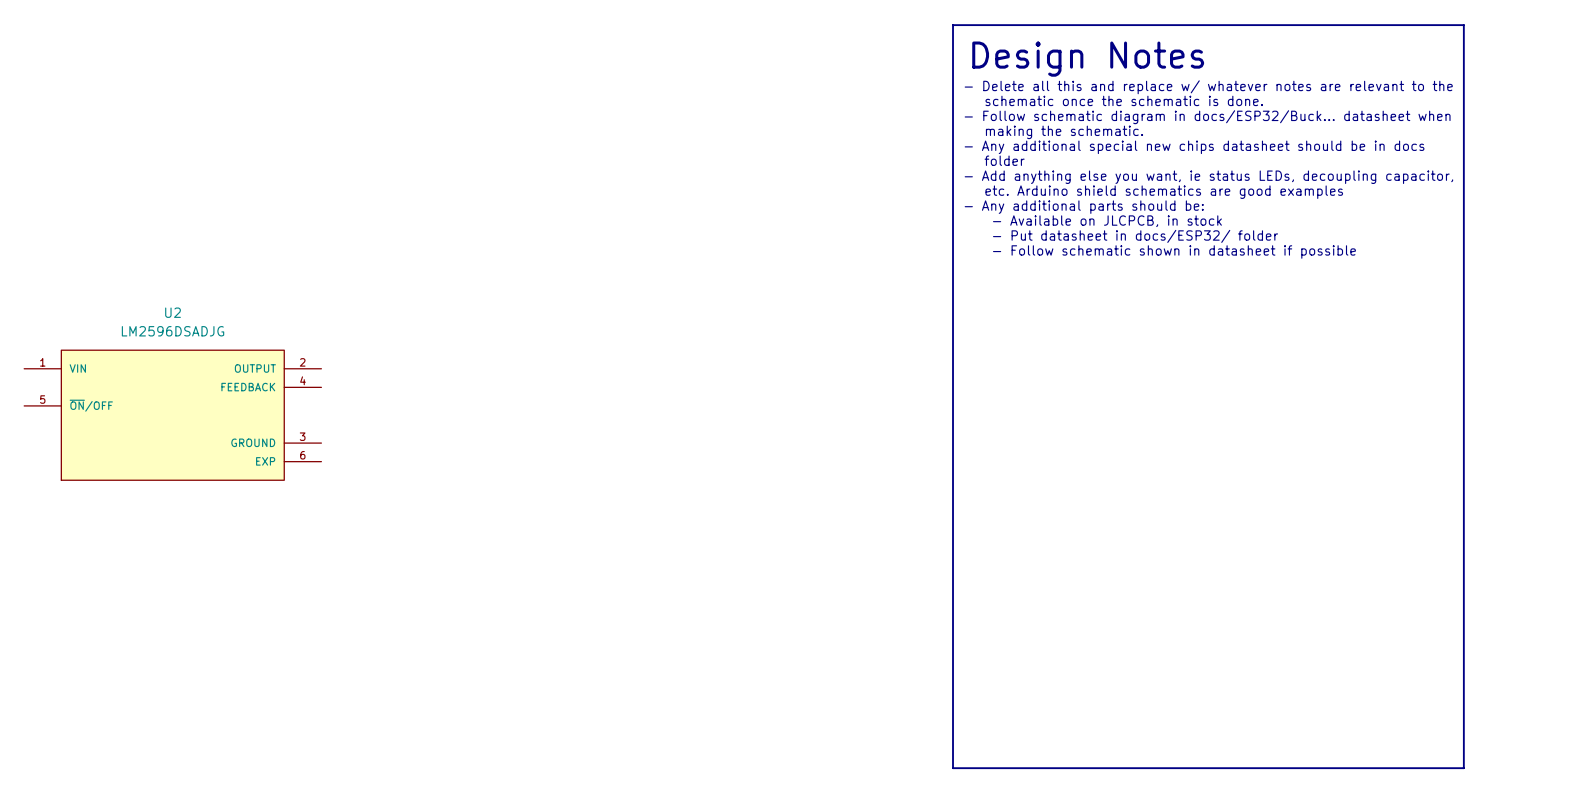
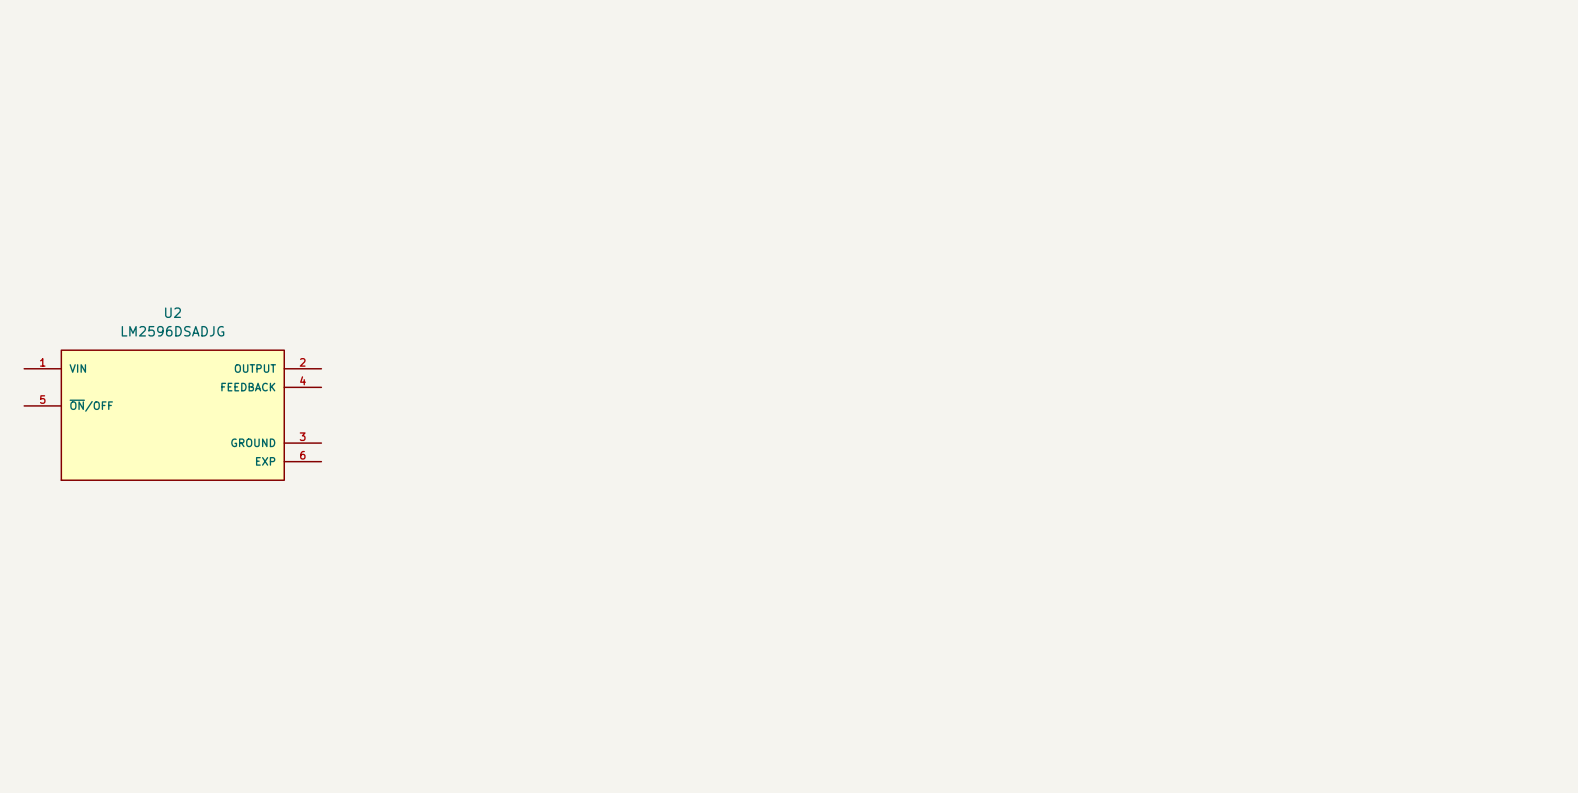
line: (953, 25) (1463, 25) (1463, 768) (953, 768) (953, 25) -> none
text: Design Notes (1088, 59) -> none
text: - Delete all this and replace w/ whatever notes are relevant to the (1208, 87) -> none
text: schematic once the schematic is done. (1124, 100) -> none
text: - Follow schematic diagram in docs/ESP32/Buck... datasheet when (1207, 117) -> none
text: making the schematic. (1064, 132) -> none
text: - Any additional special new chips datasheet should be in docs (1194, 147) -> none
text: folder (1004, 160) -> none
text: - Add anything else you want, ie status LEDs, decoupling capacitor, (1208, 177) -> none
text: etc. Arduino shield schematics are good examples (1164, 192) -> none
text: - Any additional parts should be: (1084, 207) -> none
text: - Available on JLCPCB, in stock (1107, 221) -> none
text: - Put datasheet in docs/ESP32/ folder (1135, 236) -> none
text: - Follow schematic shown in datasheet if possible (1174, 252) -> none

